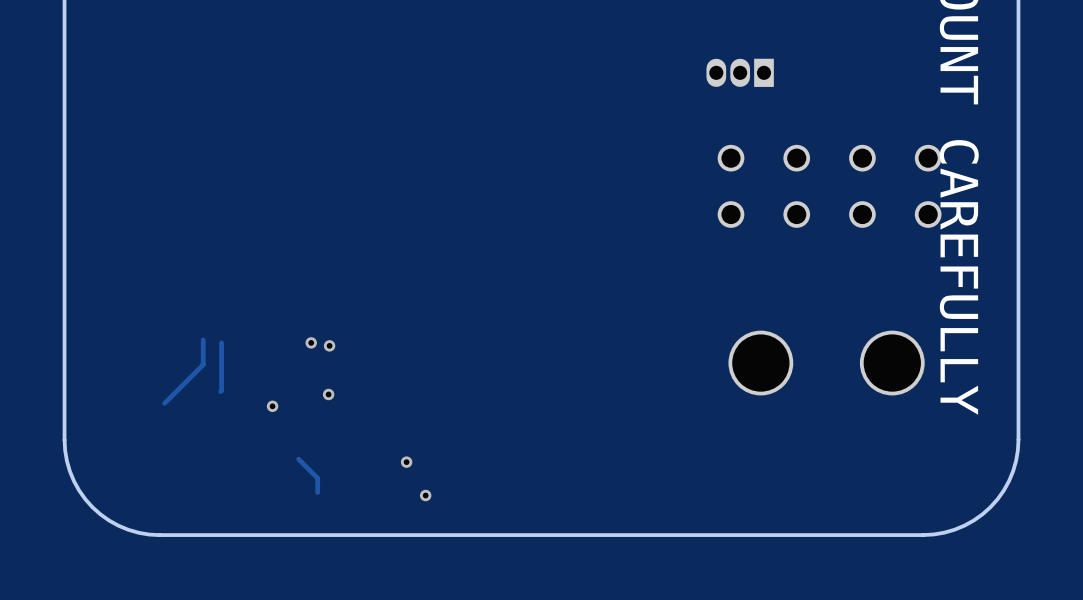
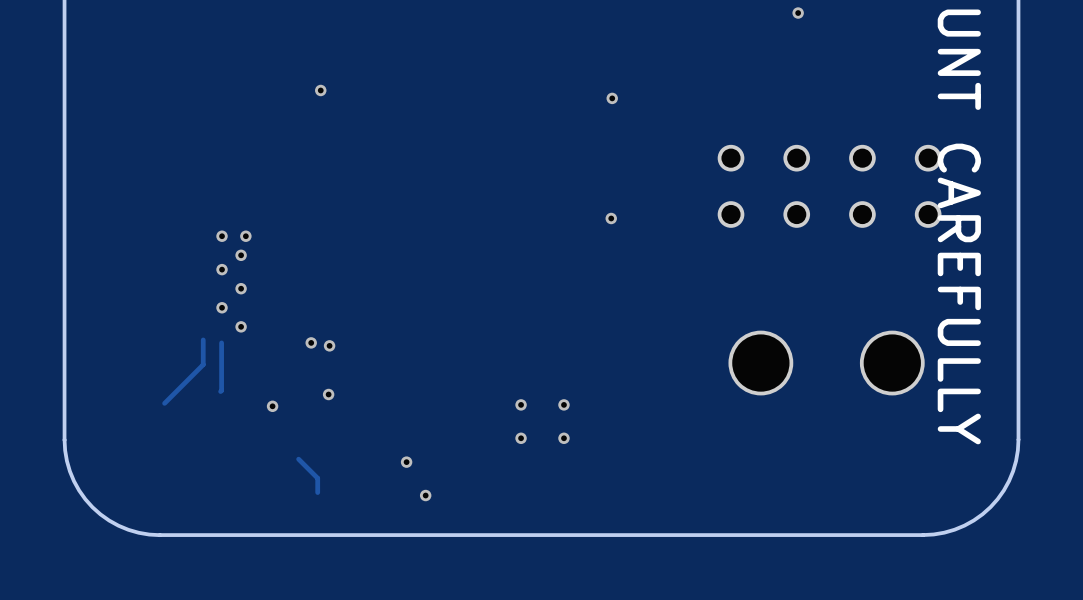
via: none -> (798, 13)
part: (740, 72) -> none
via: none -> (320, 90)
via: none -> (612, 98)
via: none -> (611, 218)
via: none -> (222, 236)
via: none -> (245, 236)
via: none -> (241, 255)
via: none -> (222, 269)
via: none -> (241, 288)
via: none -> (222, 307)
via: none -> (241, 326)
via: none -> (521, 404)
via: none -> (563, 404)
via: none -> (521, 438)
via: none -> (563, 438)

